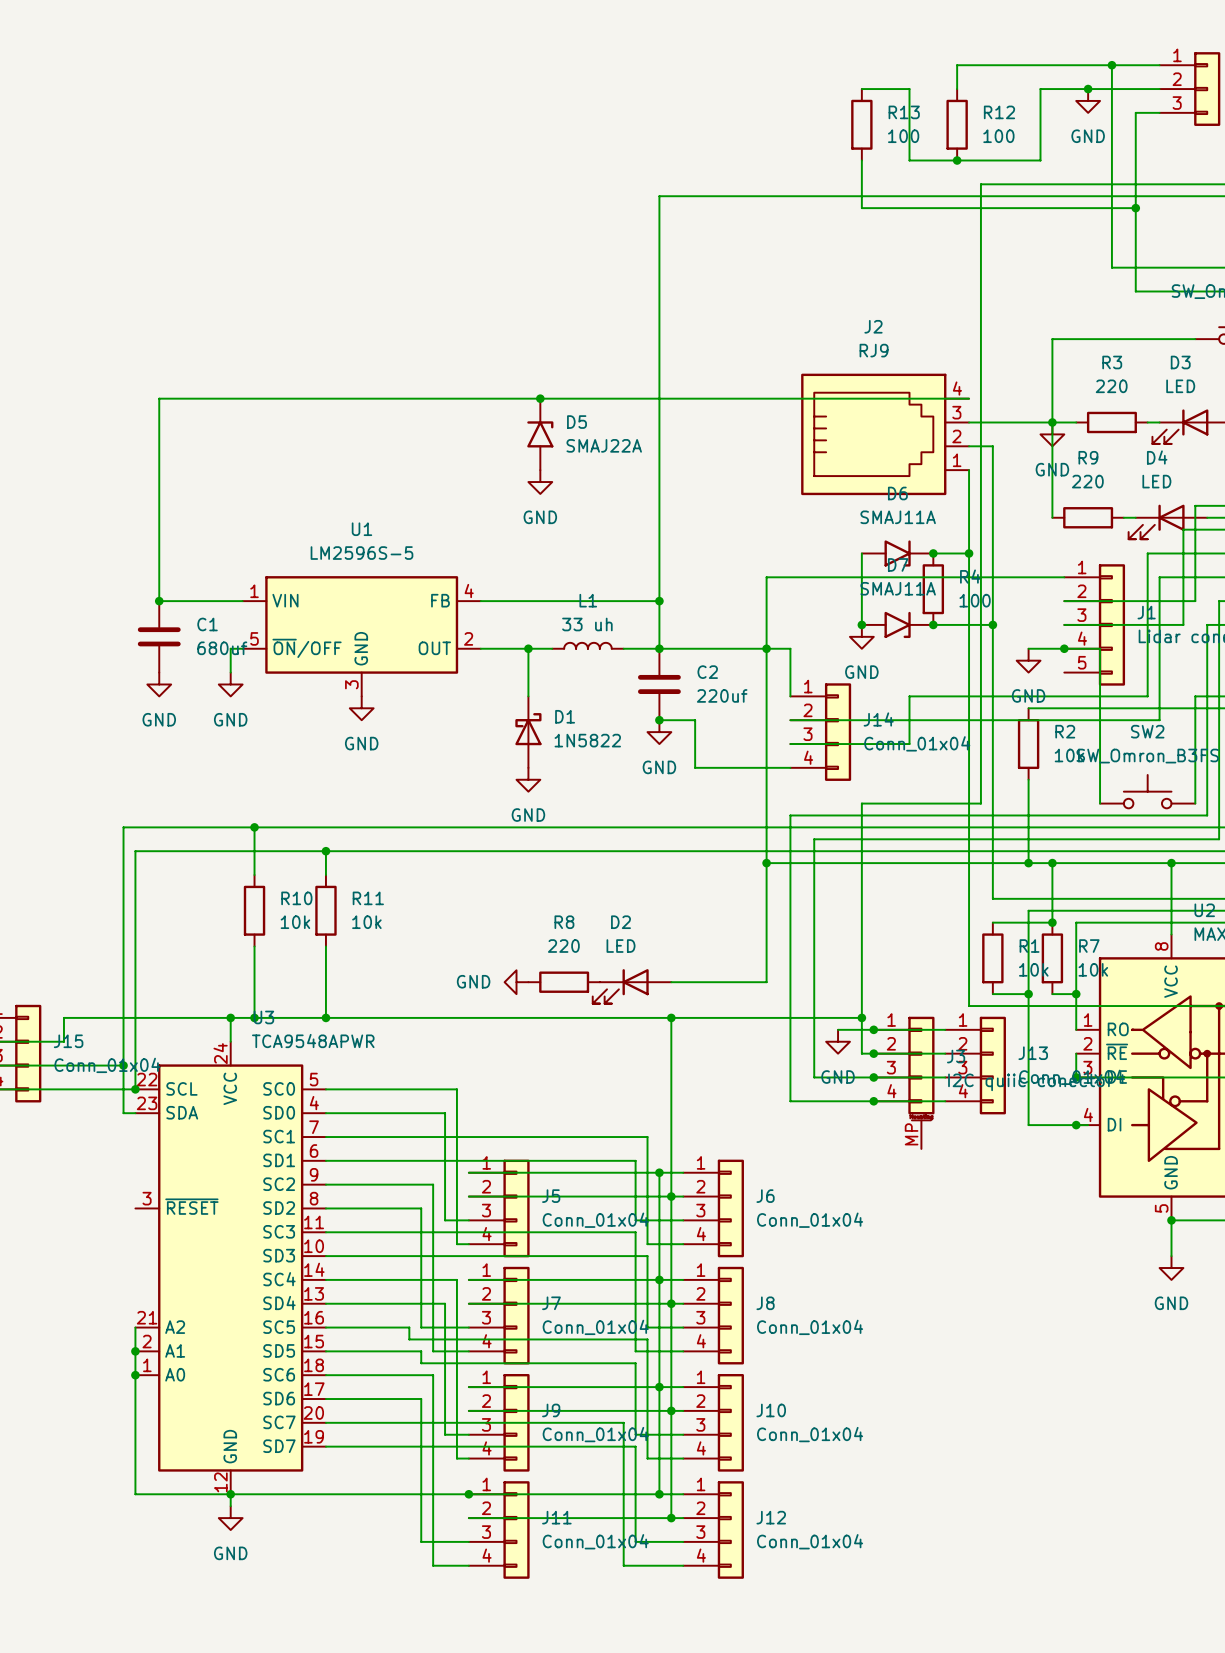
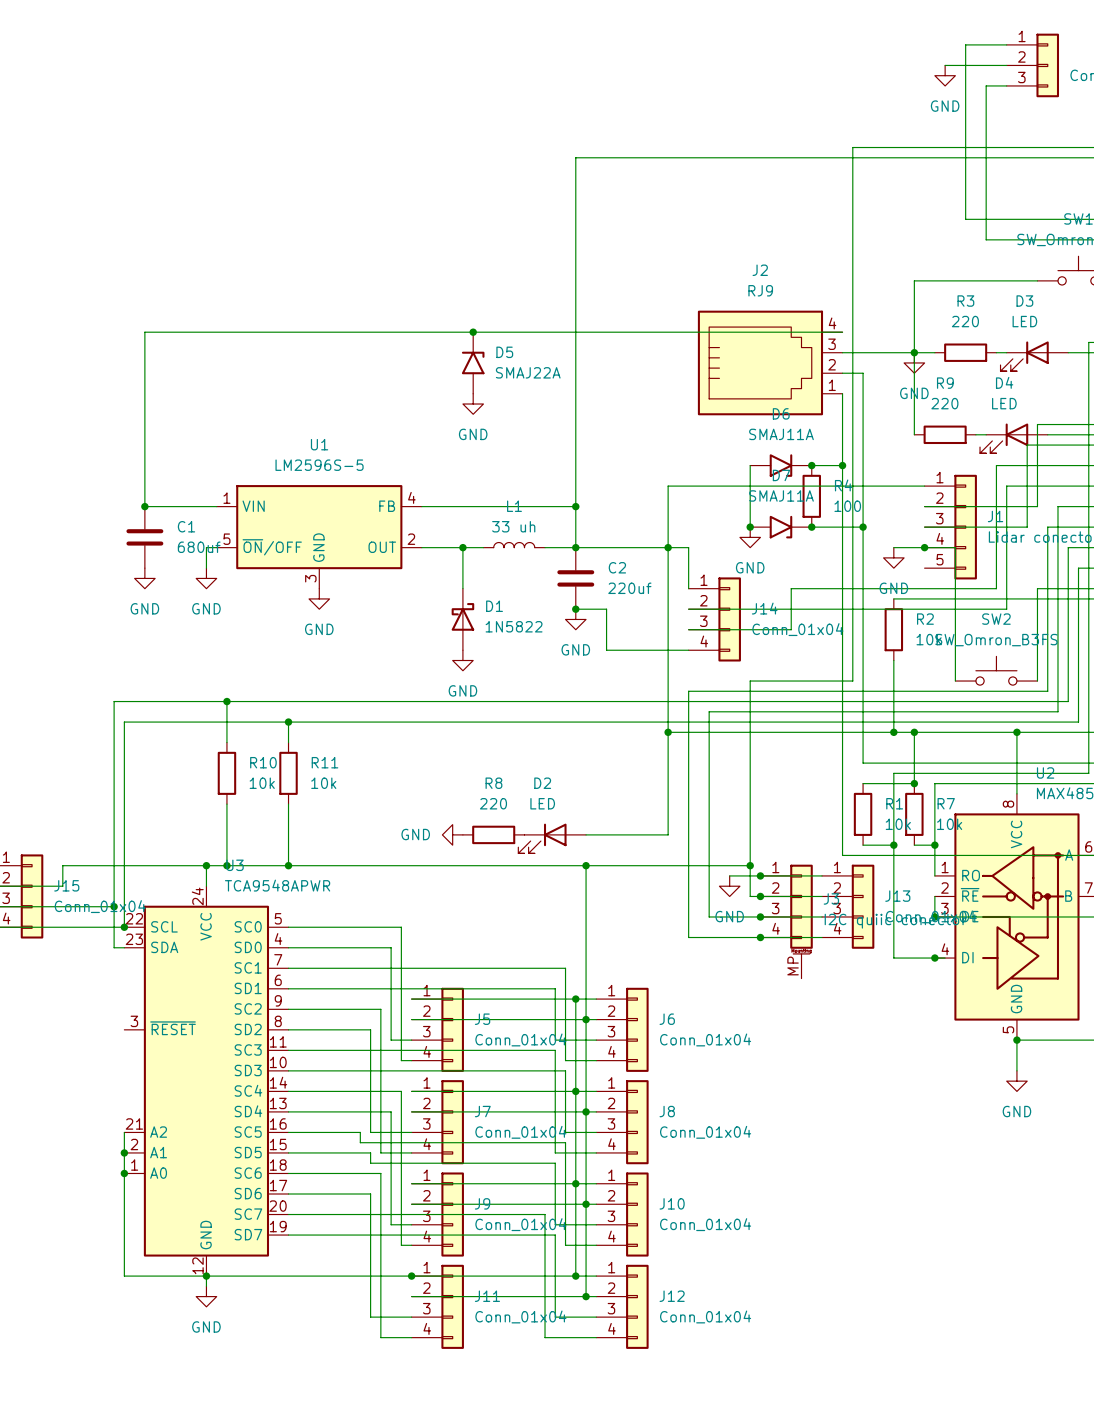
wire: (1111, 65) (957, 65) (957, 89) -> none
junction: (1111, 65) -> none
wire: (861, 89) (909, 89) (909, 160) (1040, 160) (1040, 89) (1088, 89) -> none
junction: (1088, 89) -> none
R13: 100 (861, 124) -> none
R12: 100 (957, 124) -> none
wire: (861, 160) (861, 208) (1135, 208) -> none
junction: (957, 160) -> none
junction: (1135, 208) -> none

